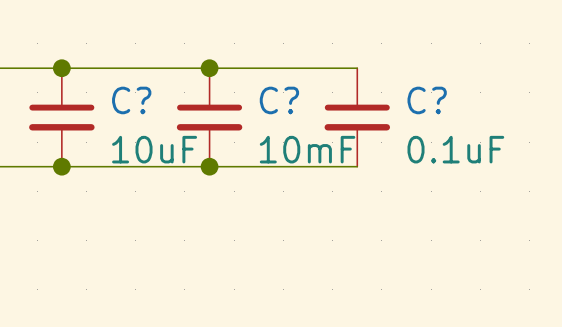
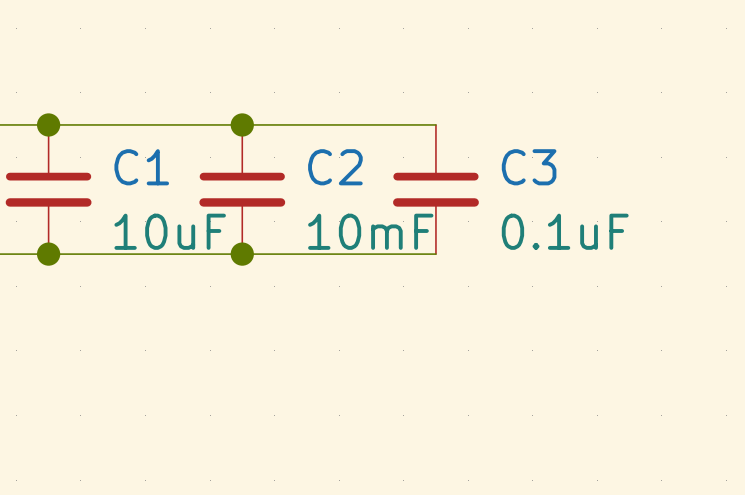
C? name: C? (131, 100) -> C1 (141, 167)
C? name: C? (279, 100) -> C2 (335, 167)
C? name: C? (427, 100) -> C3 (529, 167)

